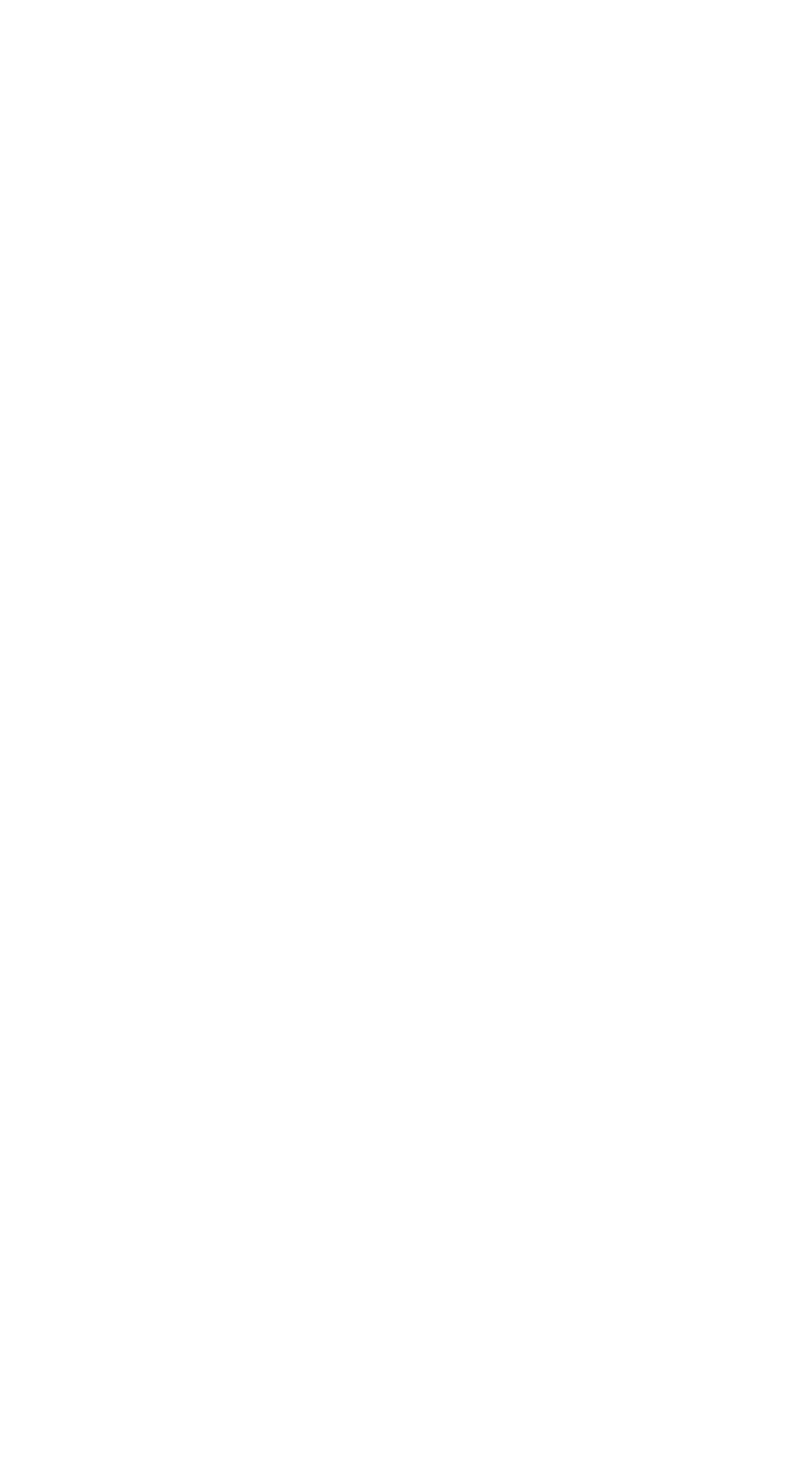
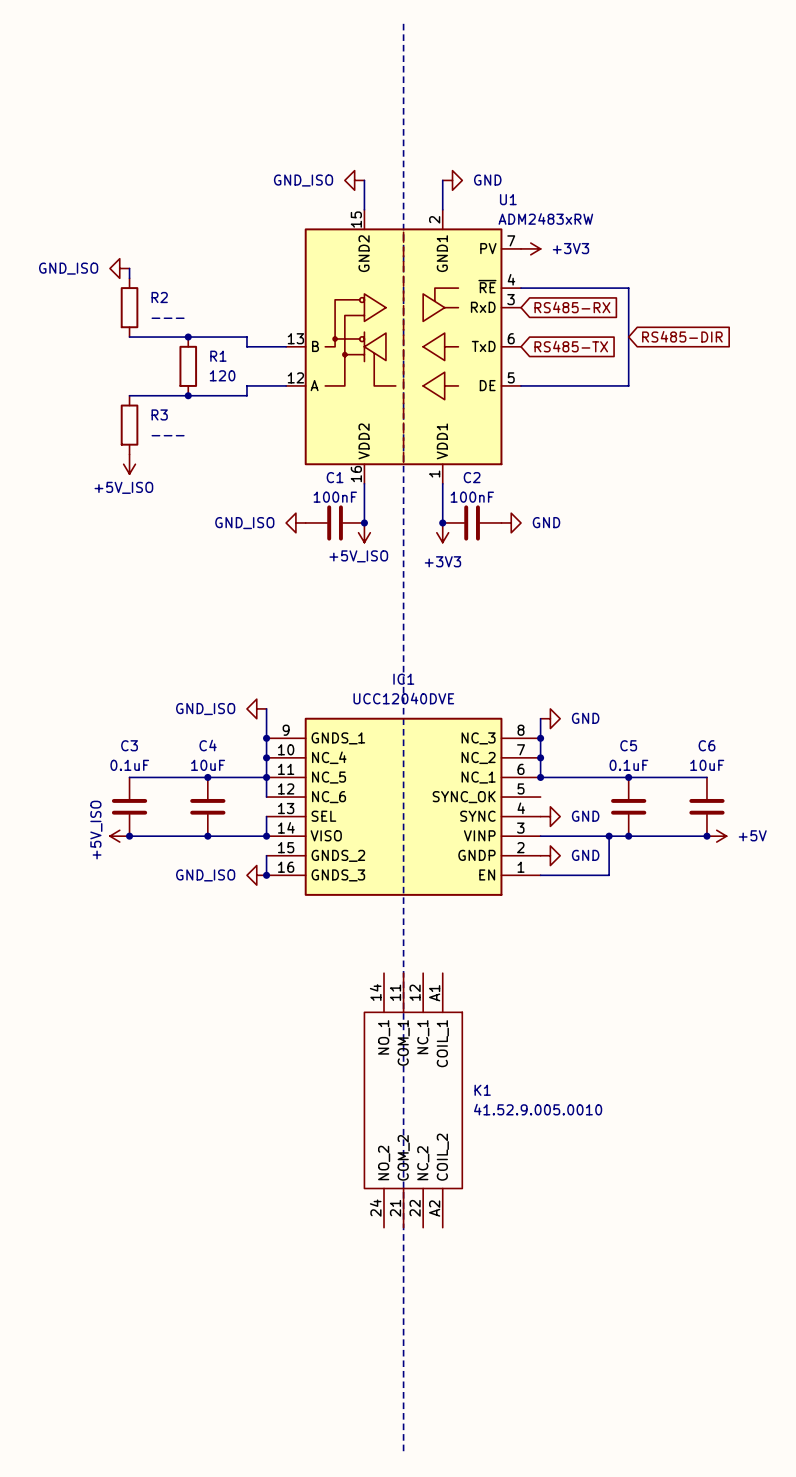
line: none -> (403, 23) (403, 1452)
power symbol: none -> GND_ISO (354, 180)
wire: none -> (364, 180) (364, 209)
wire: none -> (442, 180) (442, 209)
power symbol: none -> GND (452, 180)
power symbol: none -> +3V3 (530, 248)
power symbol: none -> GND_ISO (119, 268)
wire: none -> (129, 268) (129, 278)
wire: none -> (521, 288) (628, 288) (628, 385) (521, 385)
R2: none -> --- (129, 307)
global label: none -> RS485-RX (572, 307)
global label: none -> RS485-DIR (682, 336)
wire: none -> (129, 337) (246, 337) (246, 346) (286, 346)
junction: none -> (188, 337)
U1: none -> ADM2483xRW (403, 346)
global label: none -> RS485-TX (571, 346)
R1: none -> 120 (188, 366)
wire: none -> (286, 385) (246, 385) (246, 395) (129, 395)
junction: none -> (188, 395)
R3: none -> --- (129, 425)
power symbol: none -> +5V_ISO (129, 464)
wire: none -> (364, 483) (364, 522)
wire: none -> (442, 483) (442, 522)
power symbol: none -> GND_ISO (295, 522)
C1: none -> 100nF (335, 522)
junction: none -> (364, 522)
junction: none -> (442, 522)
C2: none -> 100nF (472, 522)
power symbol: none -> GND (511, 522)
power symbol: none -> +5V_ISO (364, 532)
power symbol: none -> +3V3 (442, 532)
power symbol: none -> GND_ISO (256, 708)
wire: none -> (266, 708) (266, 797)
wire: none -> (540, 718) (540, 777) (706, 777)
power symbol: none -> GND (550, 718)
junction: none -> (266, 738)
junction: none -> (540, 738)
junction: none -> (266, 757)
junction: none -> (540, 757)
wire: none -> (129, 777) (266, 777)
junction: none -> (207, 777)
junction: none -> (266, 777)
junction: none -> (540, 777)
junction: none -> (628, 777)
C3: none -> 0.1uF (129, 806)
C4: none -> 10uF (207, 806)
IC1: none -> UCC12040DVE (403, 806)
C5: none -> 0.1uF (628, 806)
C6: none -> 10uF (706, 806)
wire: none -> (266, 816) (266, 836) (129, 836)
power symbol: none -> GND (550, 816)
power symbol: none -> +5V_ISO (119, 836)
junction: none -> (129, 836)
junction: none -> (207, 836)
junction: none -> (266, 836)
wire: none -> (540, 836) (706, 836)
wire: none -> (609, 836) (609, 875) (540, 875)
junction: none -> (609, 836)
junction: none -> (628, 836)
junction: none -> (706, 836)
power symbol: none -> +5V (716, 836)
wire: none -> (266, 855) (266, 875)
power symbol: none -> GND (550, 855)
power symbol: none -> GND_ISO (256, 875)
junction: none -> (266, 875)
K1: none -> 41.52.9.005.0010 (413, 1100)

